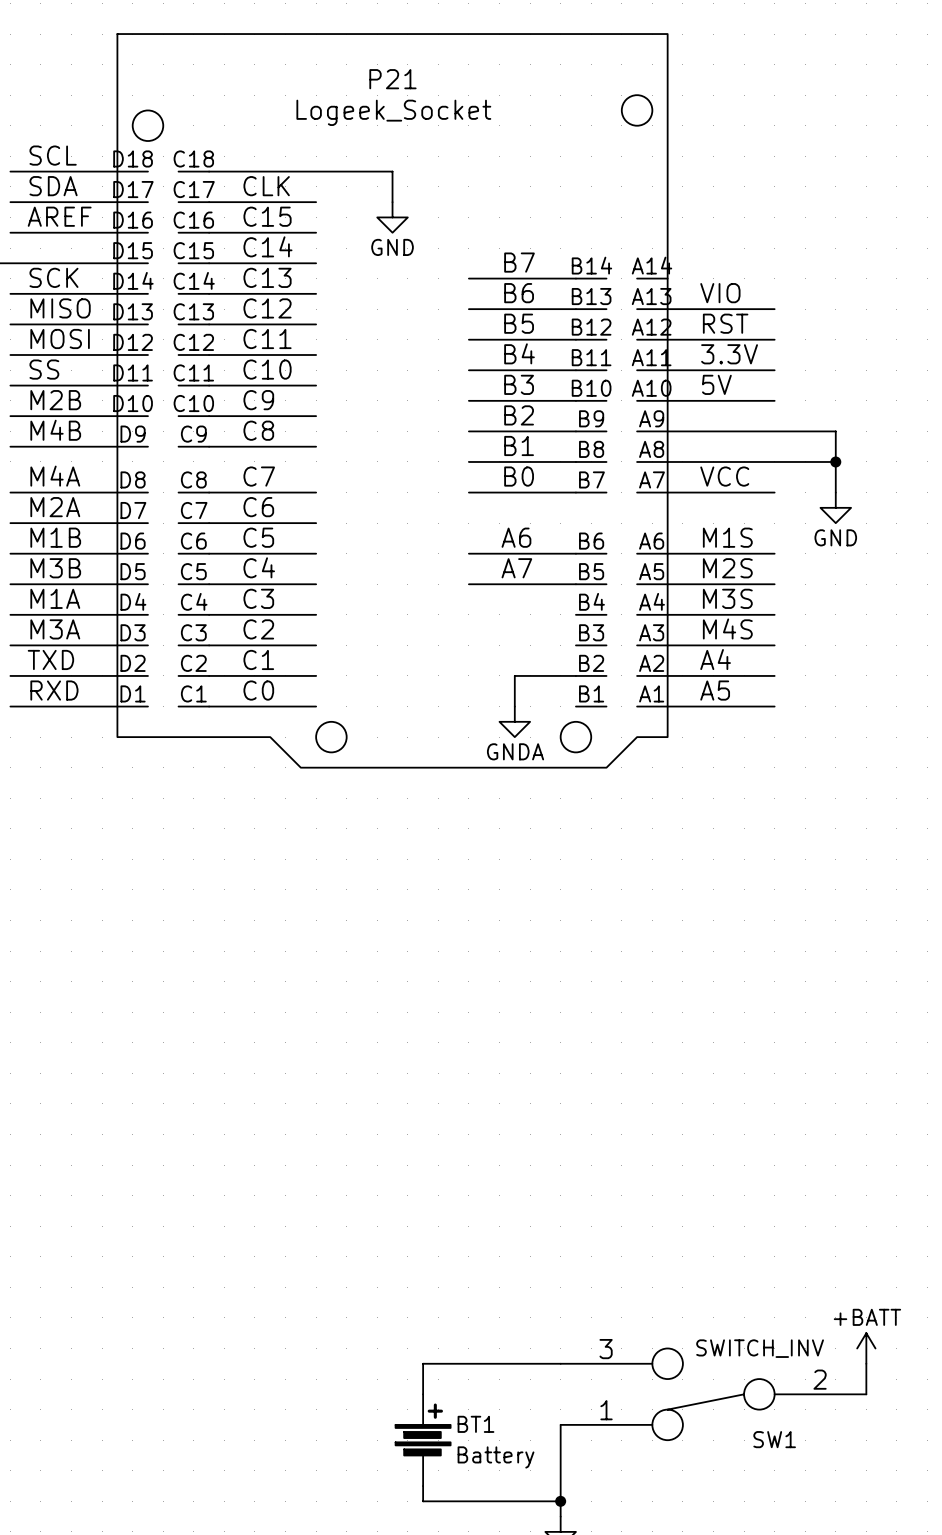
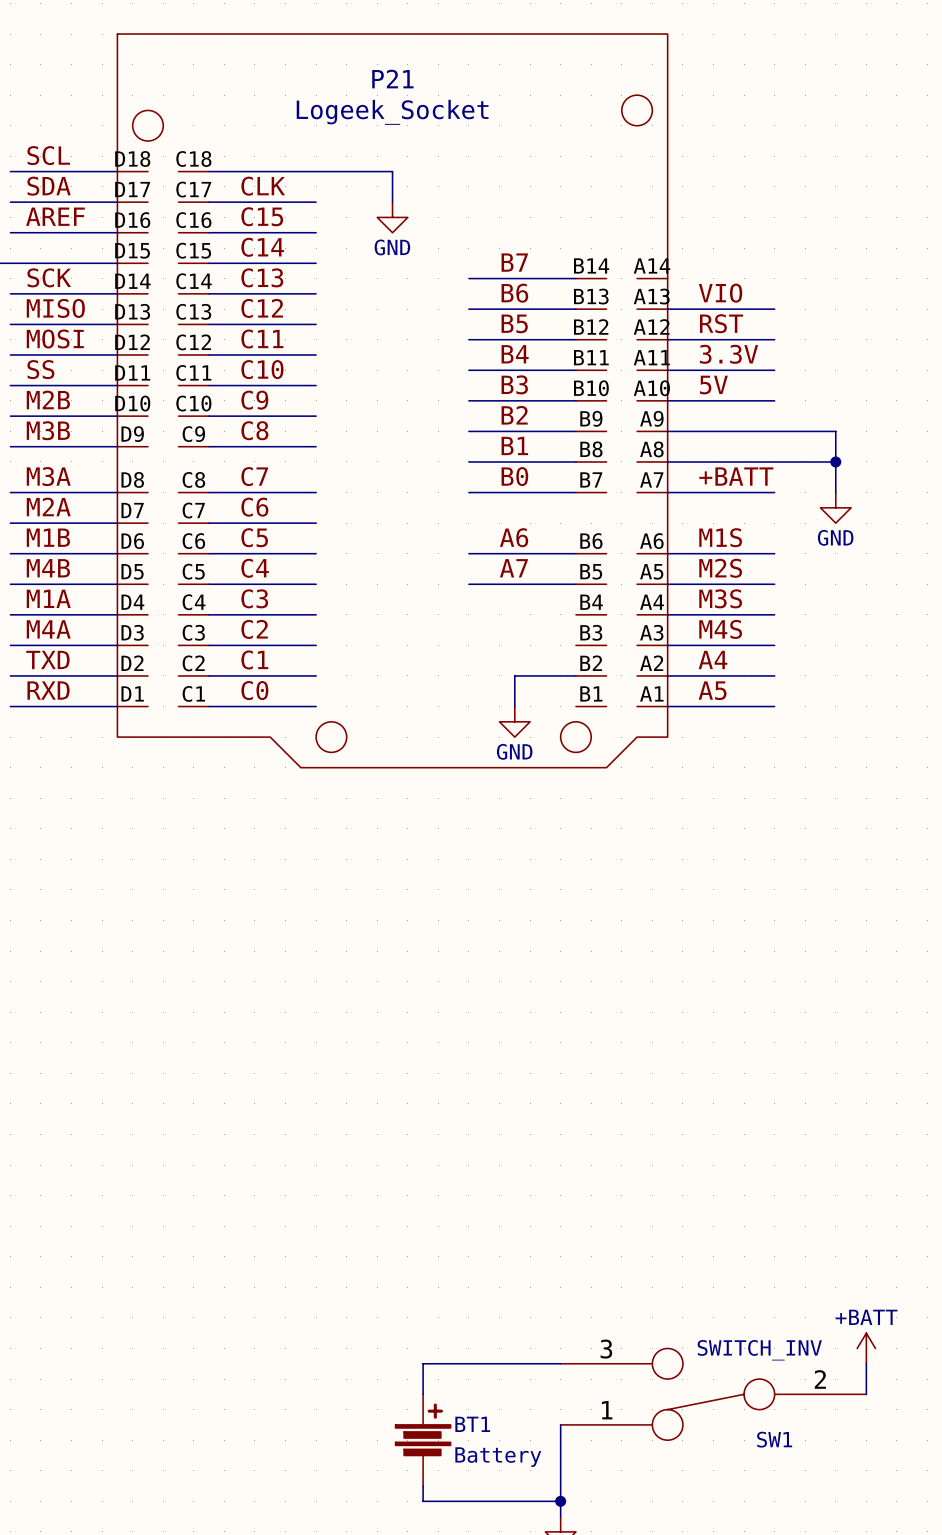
label: M4B (55, 430) -> M3B (48, 430)
label: M4A (55, 476) -> M3A (48, 476)
label: VCC (724, 476) -> +BATT (736, 476)
label: M3B (55, 568) -> M4B (48, 568)
label: M3A (55, 629) -> M4A (48, 629)
power symbol: GNDA (514, 721) -> GND (514, 721)

